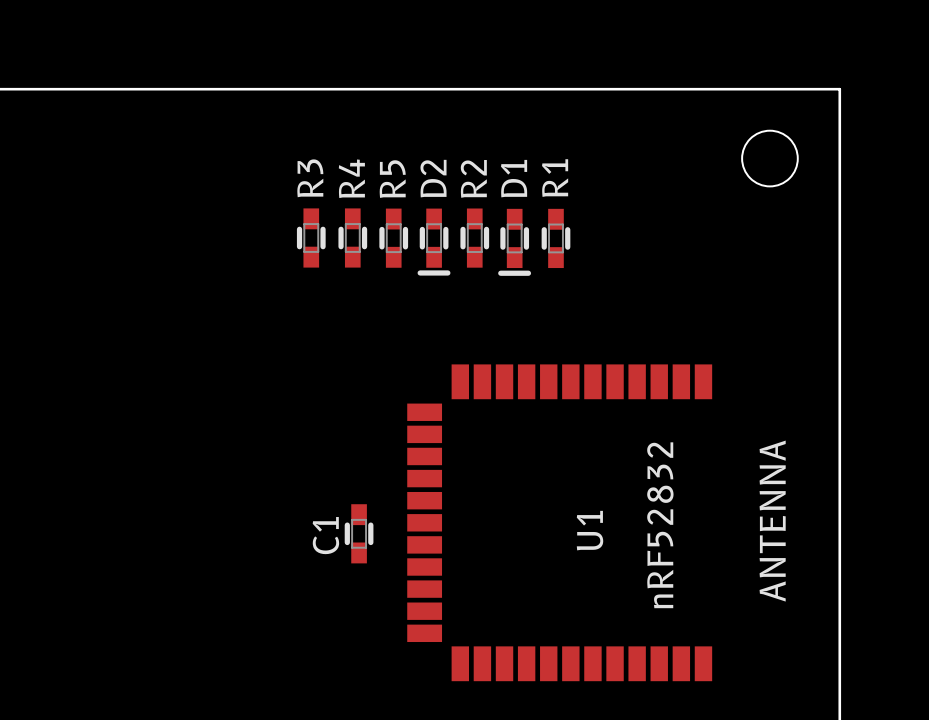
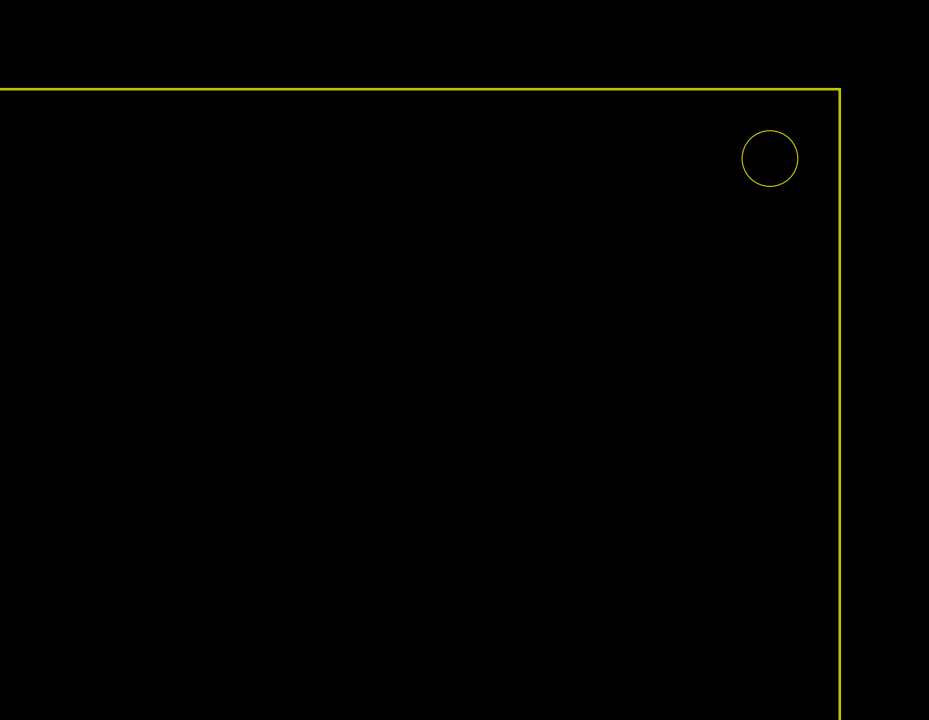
R3: (311, 237) -> none
R4: (352, 237) -> none
R5: (393, 238) -> none
R2: (474, 238) -> none
R1: (555, 238) -> none
D2: (434, 242) -> none
D1: (514, 242) -> none
U1: nRF52832 (559, 522) -> none
C1: (359, 533) -> none

